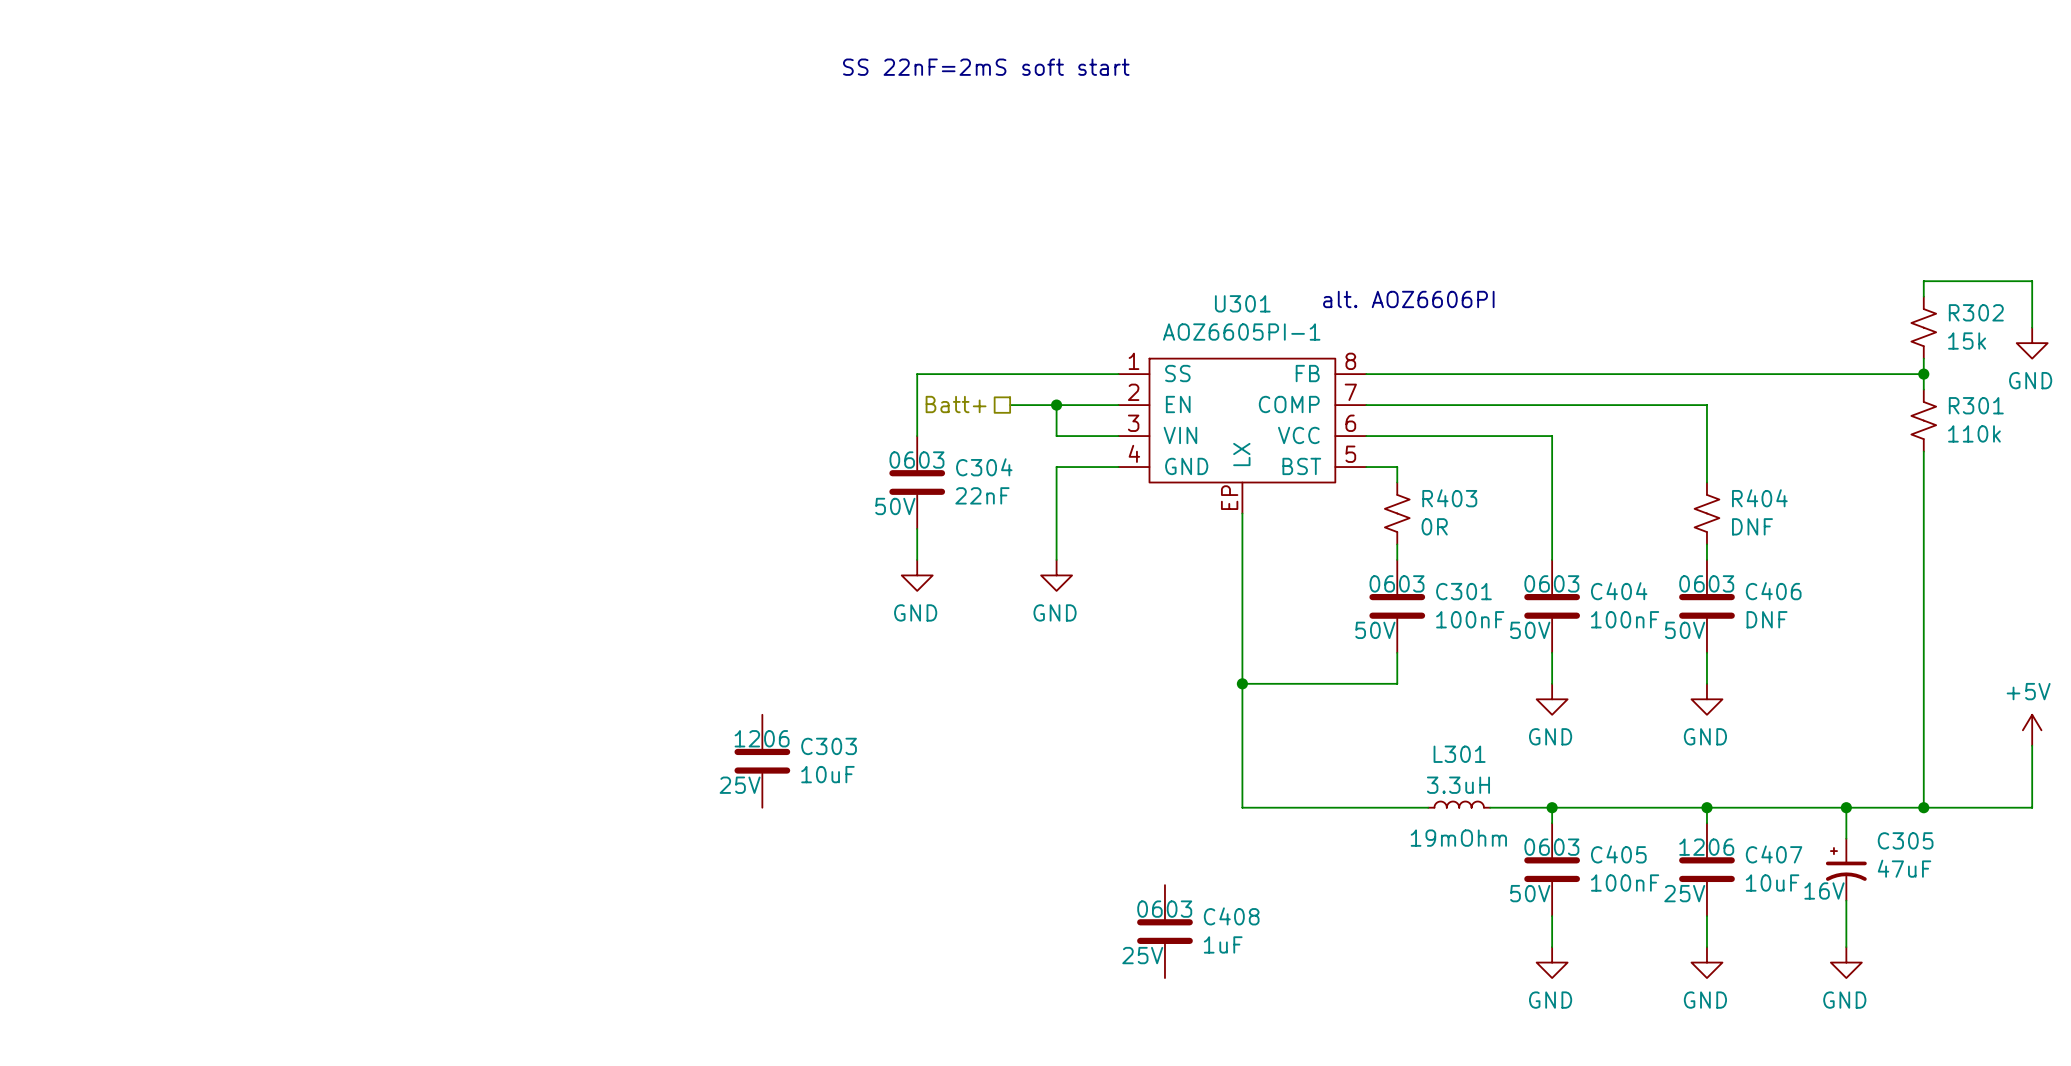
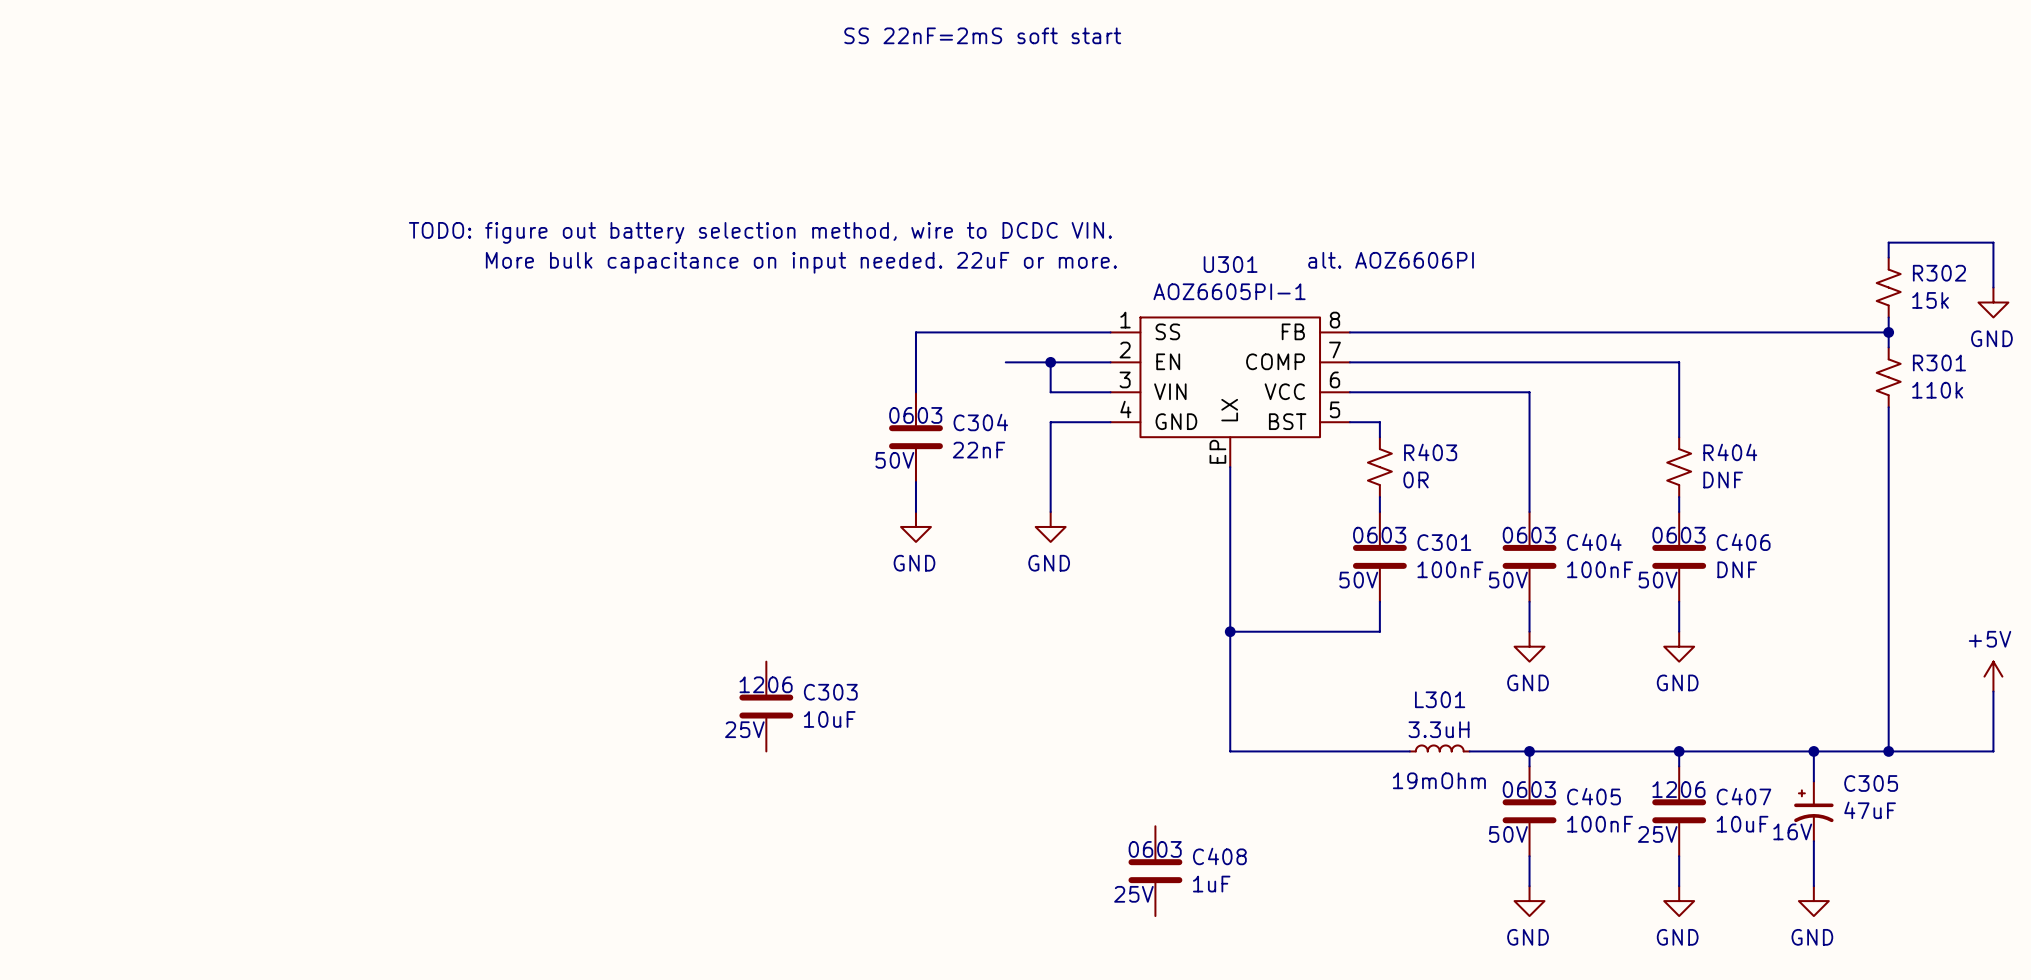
text: none -> TODO: figure out battery selection method, wire to DCDC VIN. (760, 232)
text: none -> More bulk capacitance on input needed. 22uF or more. (801, 262)
hierarchical label: Batt+ (956, 404) -> none

